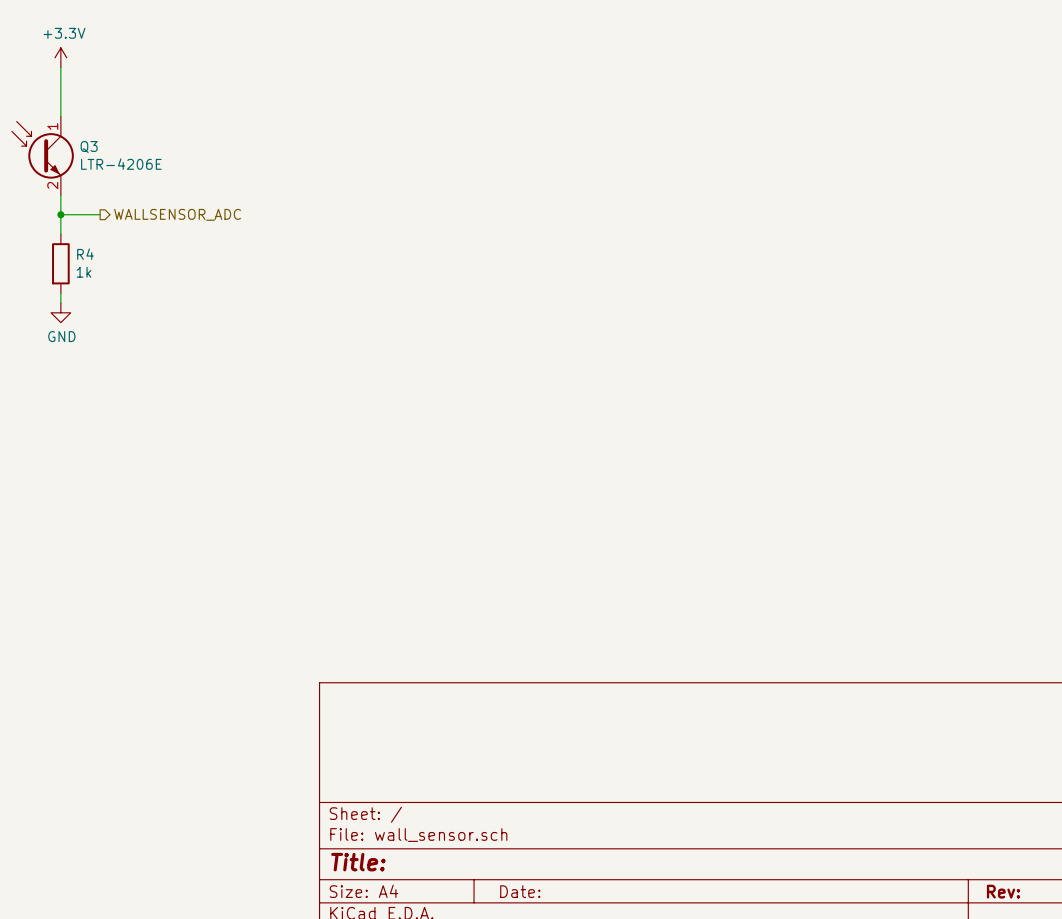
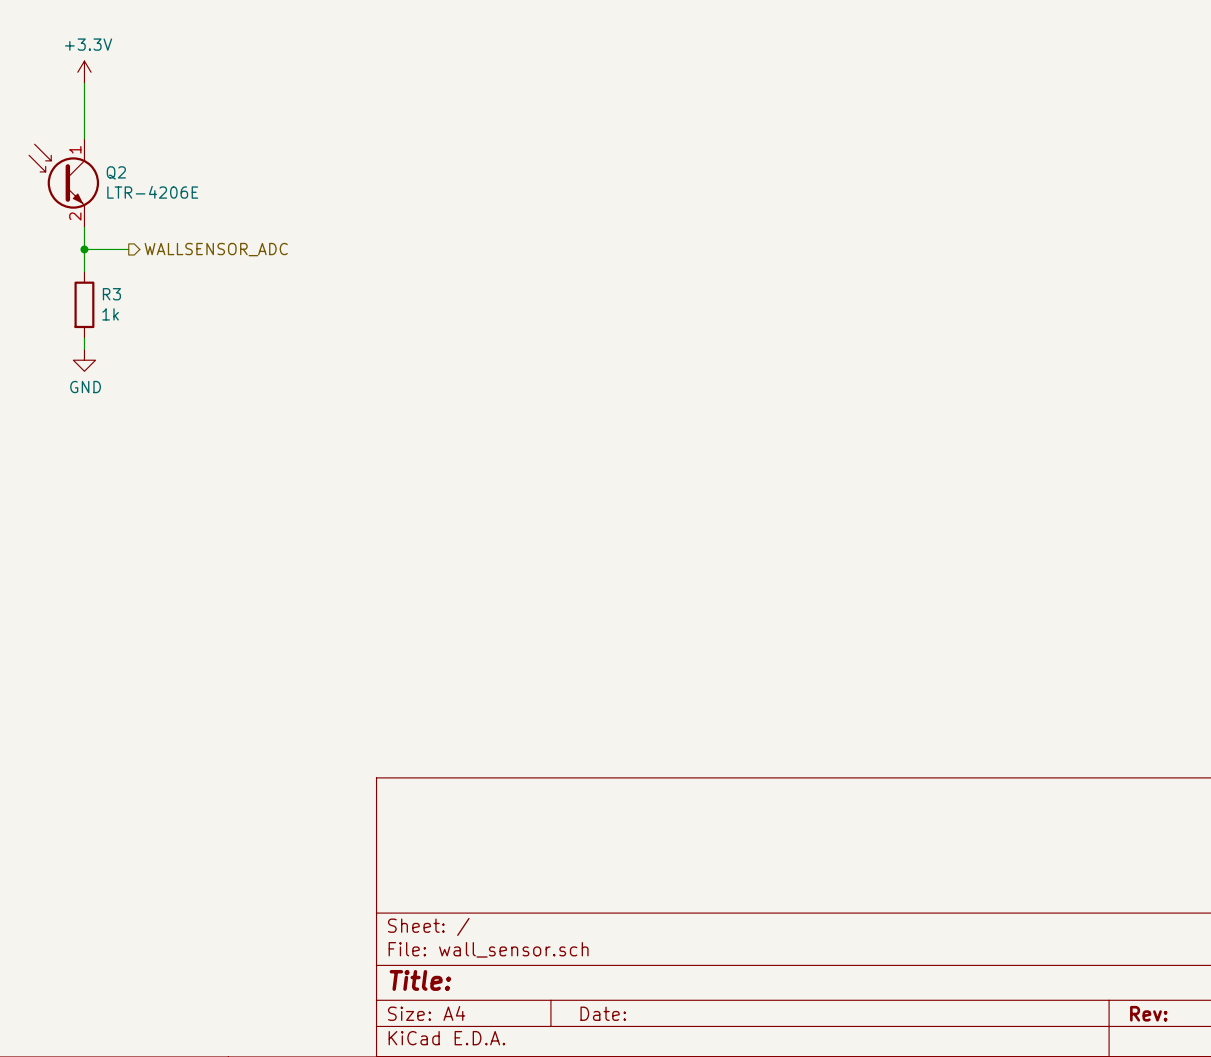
Q3 name: Q3 (89, 146) -> Q2 (116, 172)
R4 name: R4 (85, 254) -> R3 (111, 294)

